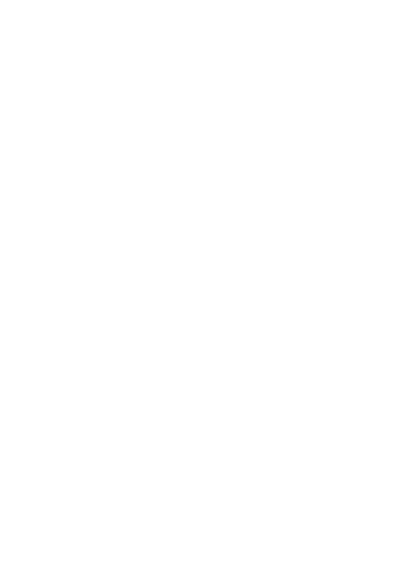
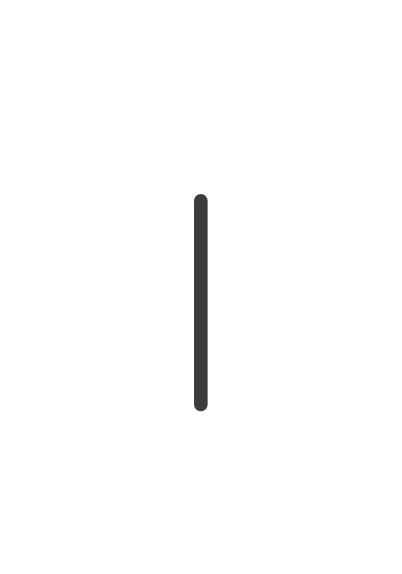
line: none -> (200, 200) (200, 404)

